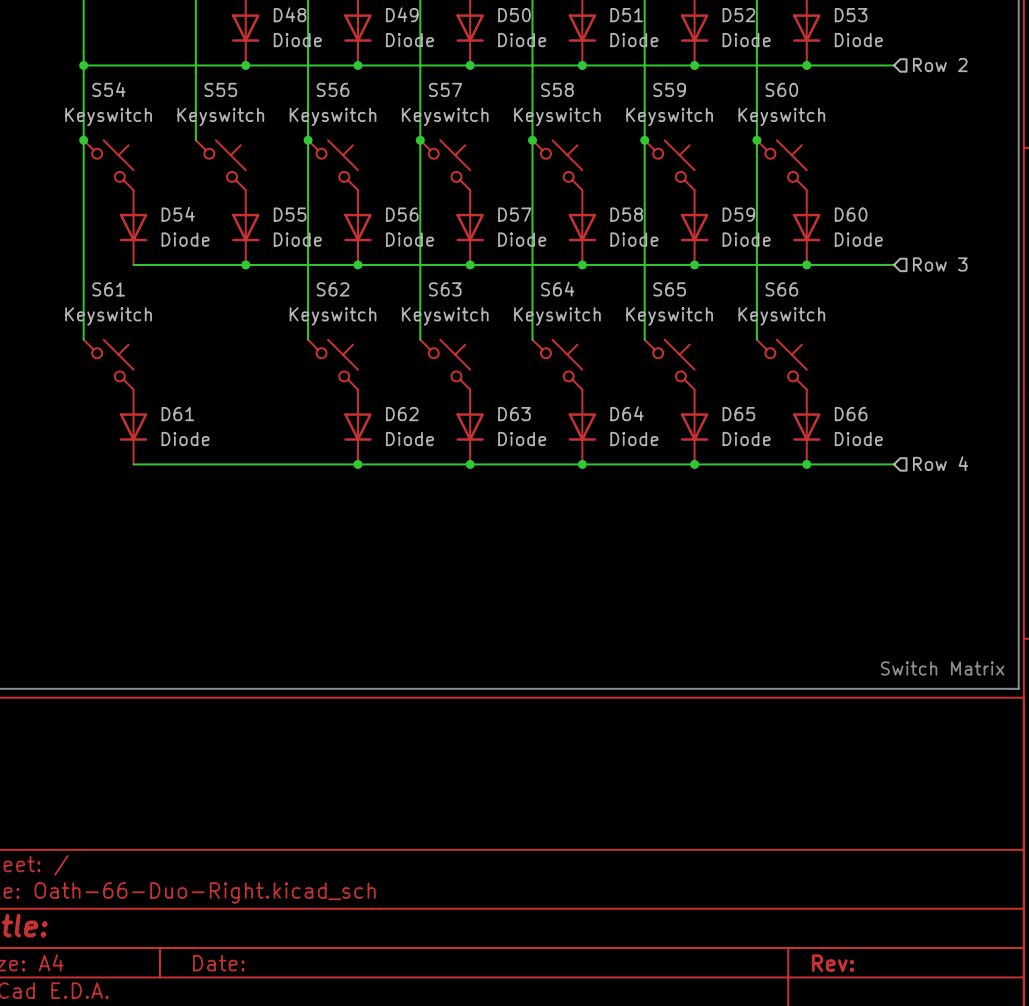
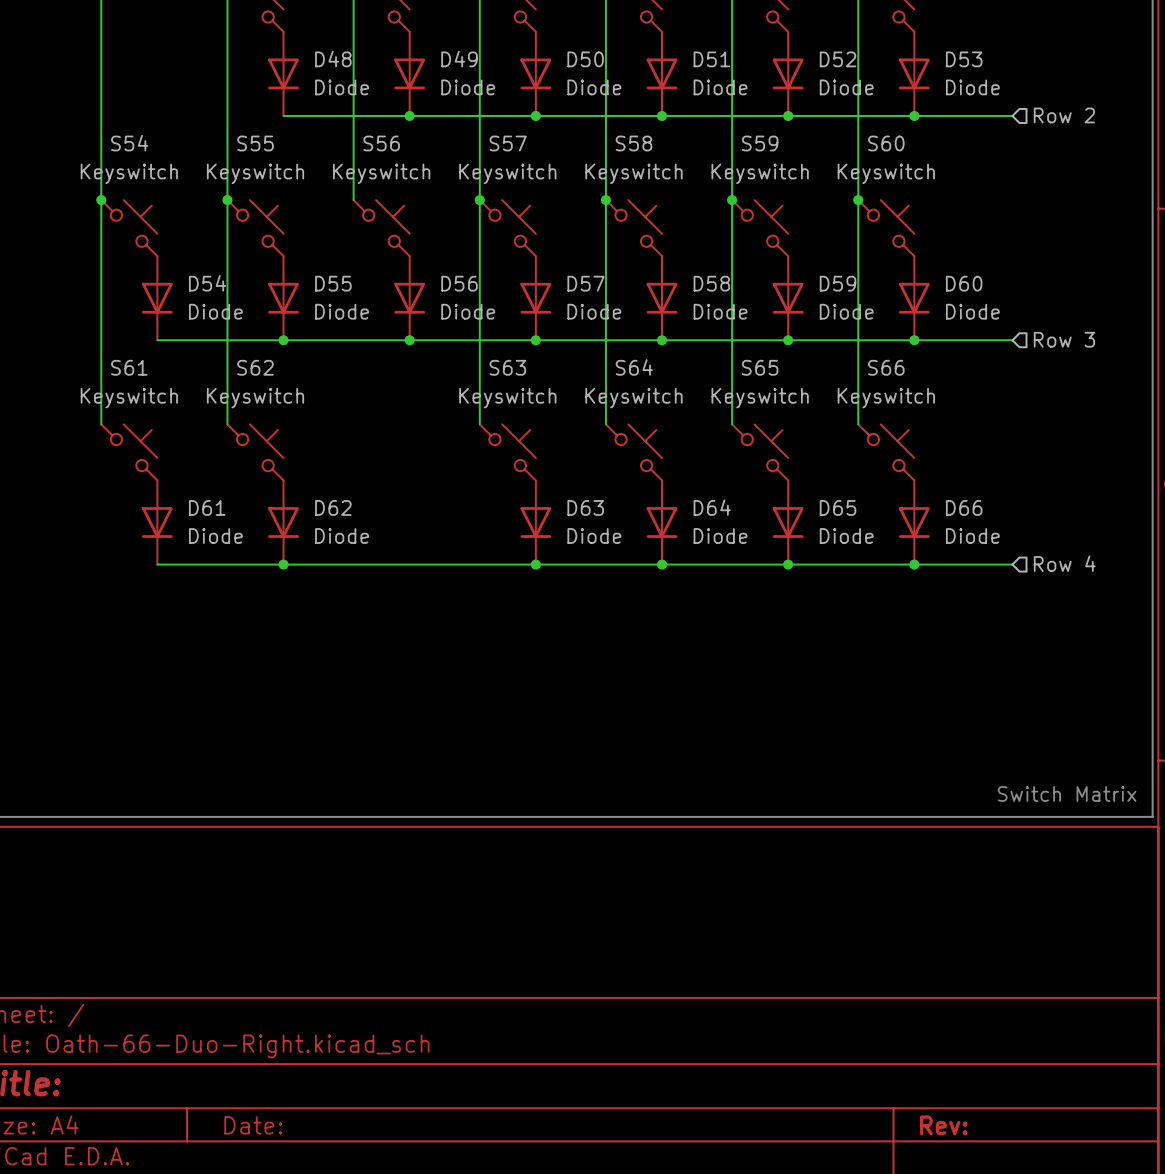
wire: (83, 65) (245, 65) -> none
junction: (83, 65) -> none
junction: (245, 65) -> none
junction: none -> (227, 200)
wire: (308, 140) (308, 339) -> (227, 200) (227, 424)
junction: (308, 140) -> none
S62 position: (333, 364) -> (255, 452)
D62 position: (357, 427) -> (283, 522)
junction: none -> (283, 564)
junction: (357, 464) -> none

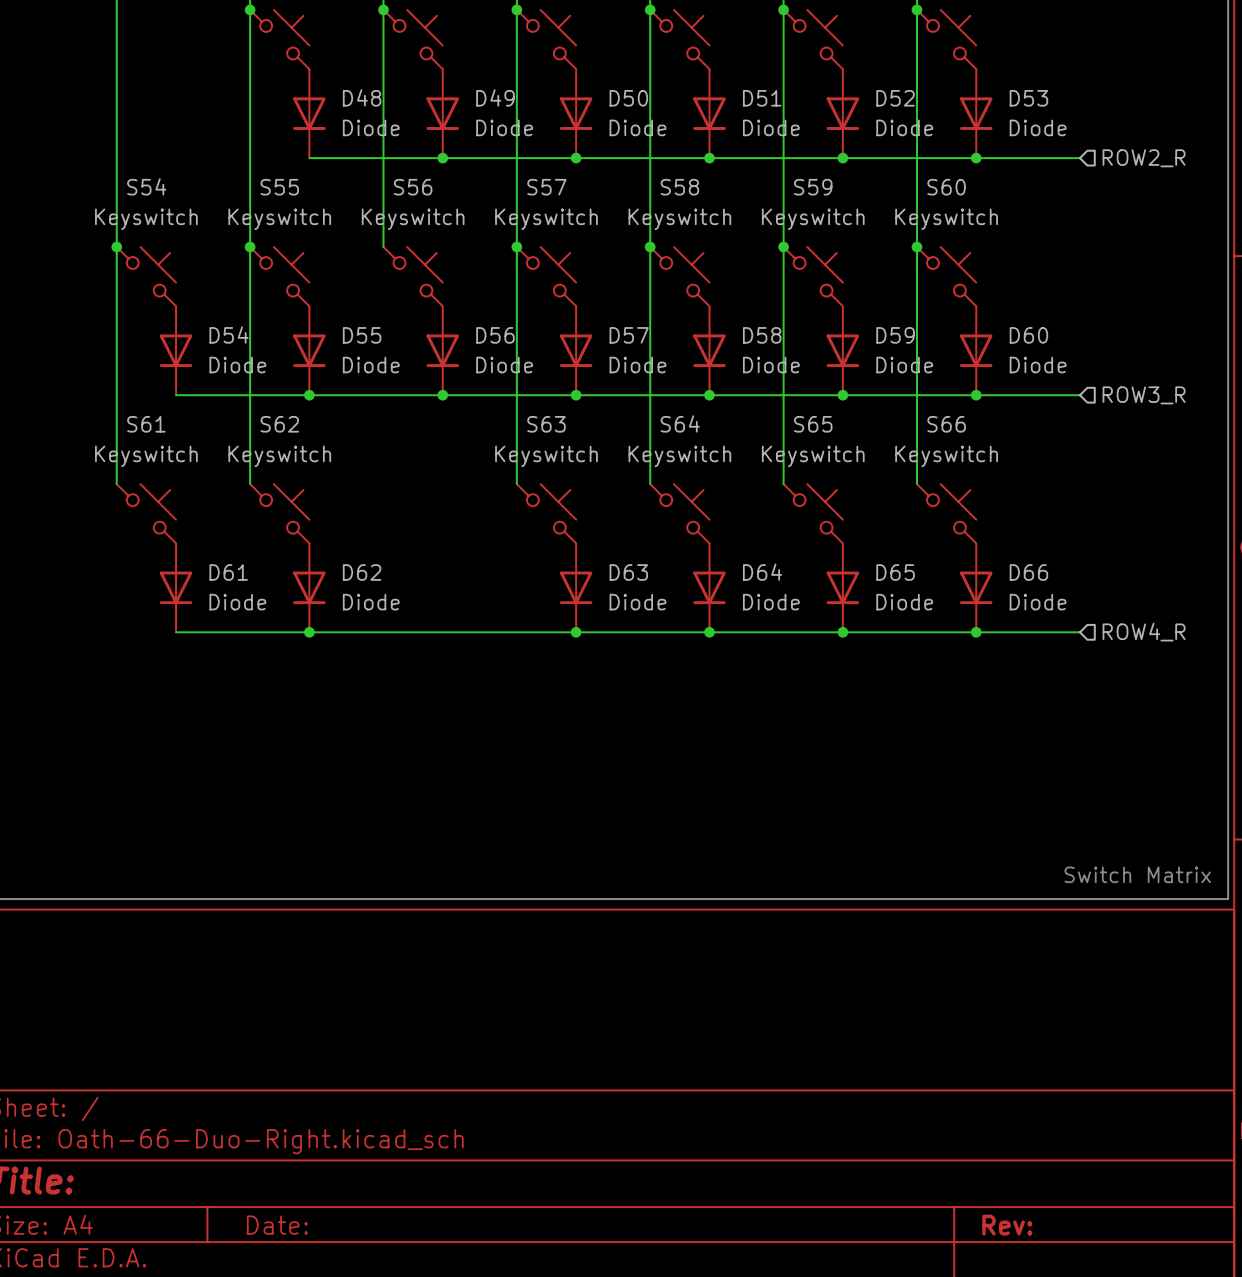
hierarchical label: Row 2 (1064, 115) -> ROW2_R (1144, 158)
hierarchical label: Row 3 (1064, 339) -> ROW3_R (1144, 395)
hierarchical label: Row 4 (1064, 563) -> ROW4_R (1144, 632)

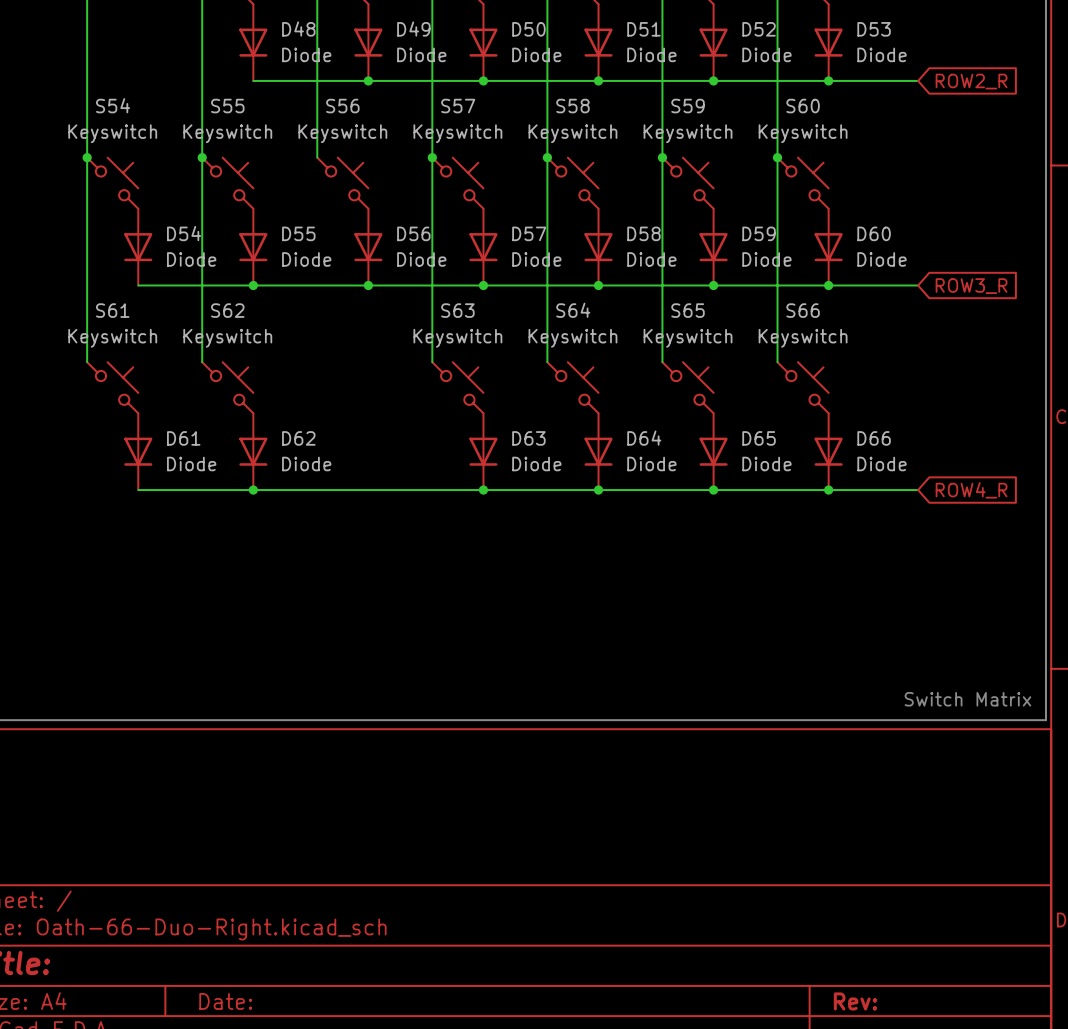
global label: none -> ROW2_R (971, 81)
hierarchical label: ROW2_R (1144, 158) -> none
global label: none -> ROW3_R (971, 286)
hierarchical label: ROW3_R (1144, 395) -> none
global label: none -> ROW4_R (971, 490)
hierarchical label: ROW4_R (1144, 632) -> none

